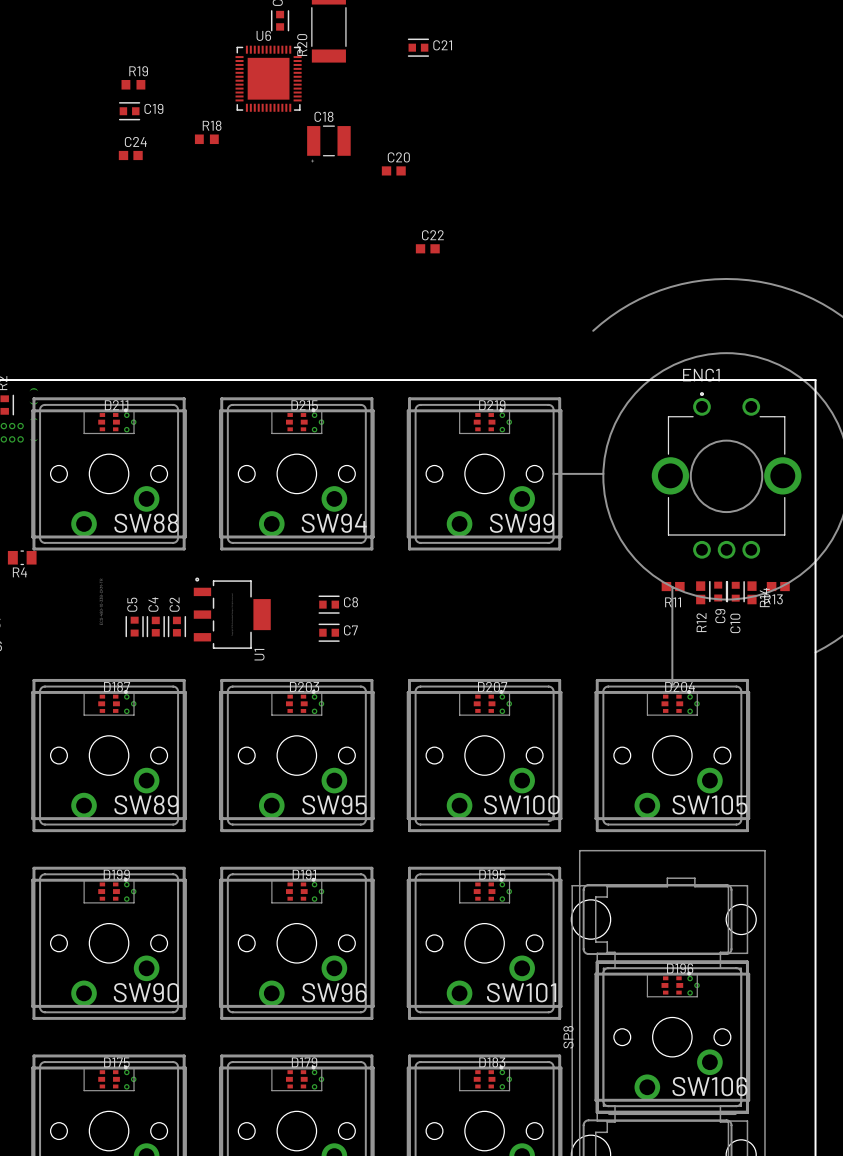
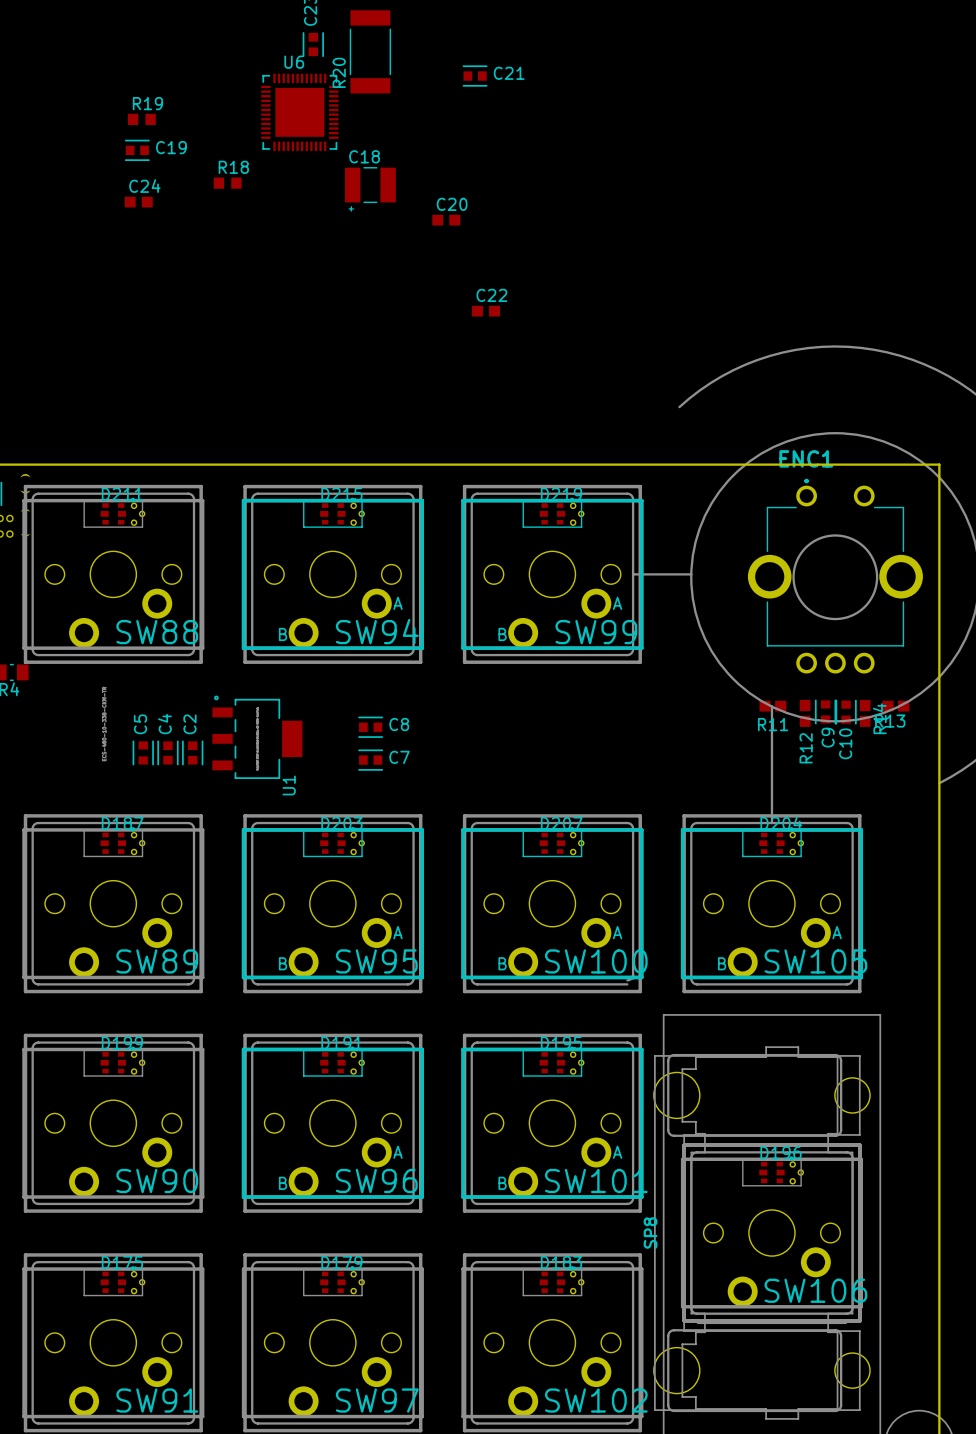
SW94 footprint: [218, 397, 375, 551] -> [241, 484, 424, 664]
SW99 footprint: [406, 397, 563, 551] -> [461, 484, 644, 664]
SW95 footprint: [218, 678, 375, 833] -> [241, 814, 424, 994]
SW100 footprint: [406, 678, 563, 833] -> [461, 814, 644, 994]
SW105 footprint: [594, 678, 751, 833] -> [680, 814, 864, 994]
SW96 footprint: [218, 866, 375, 1020] -> [241, 1033, 424, 1213]
SW101 footprint: [406, 866, 563, 1020] -> [461, 1033, 644, 1213]

